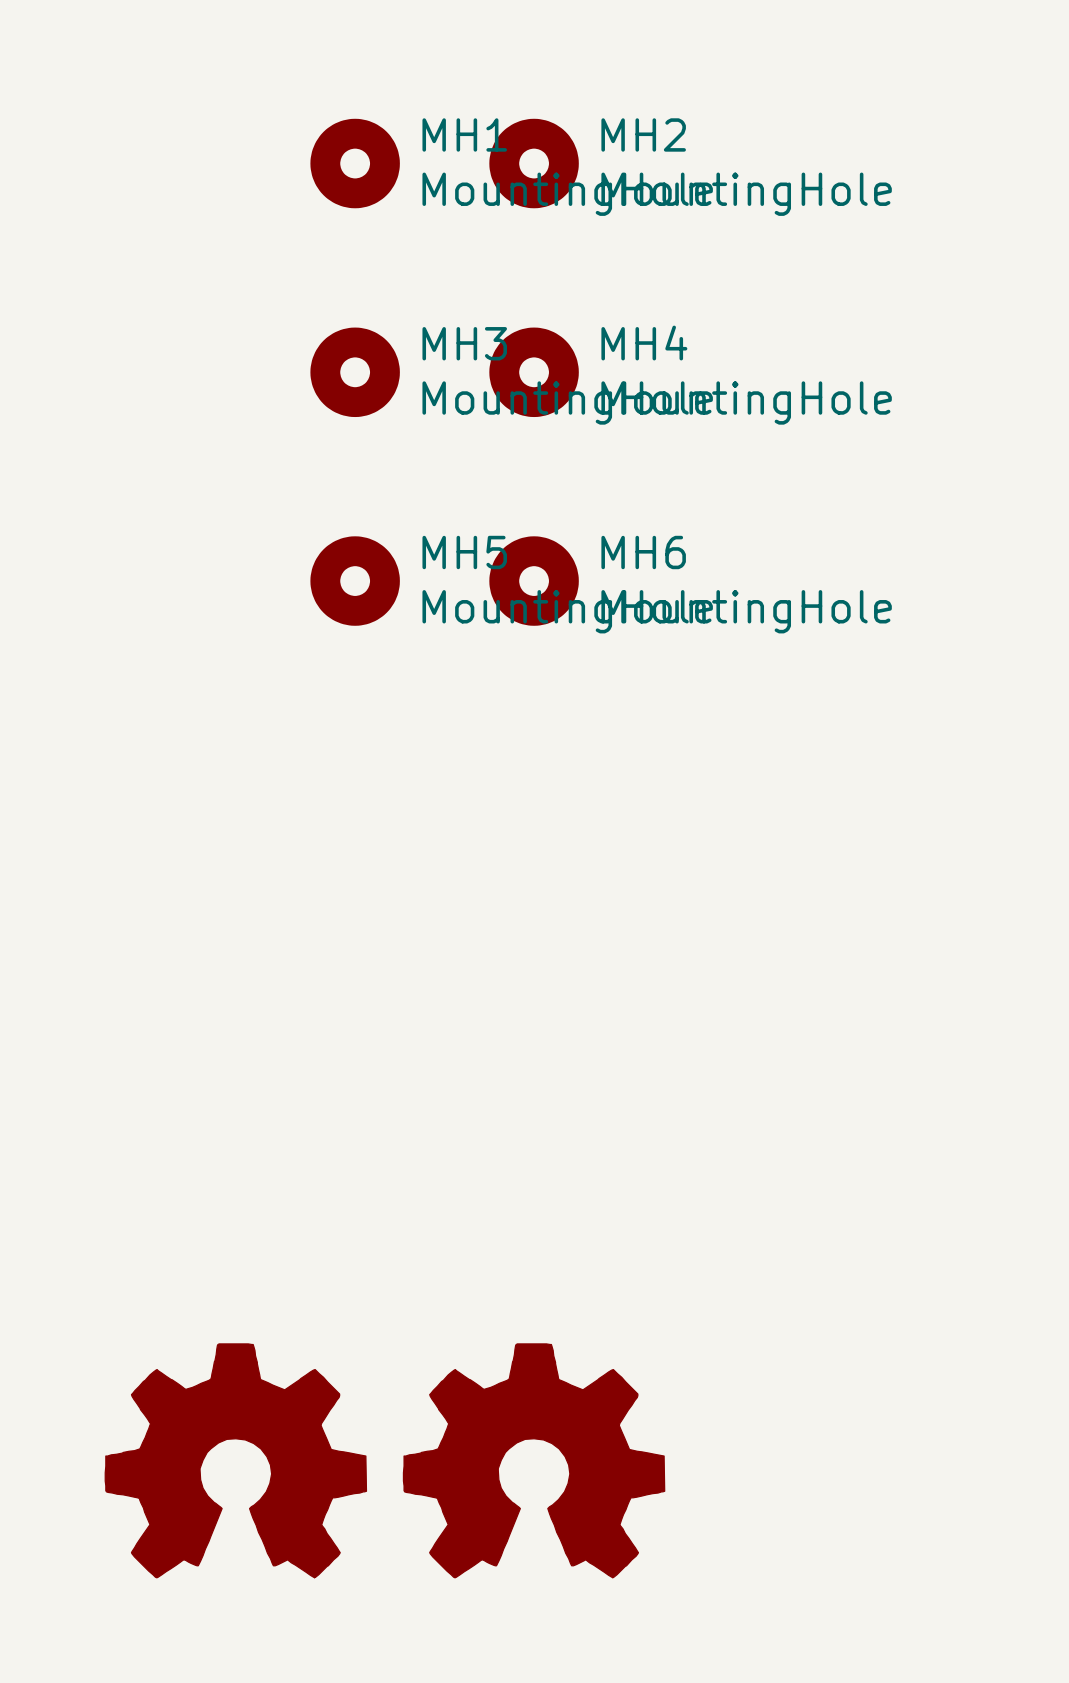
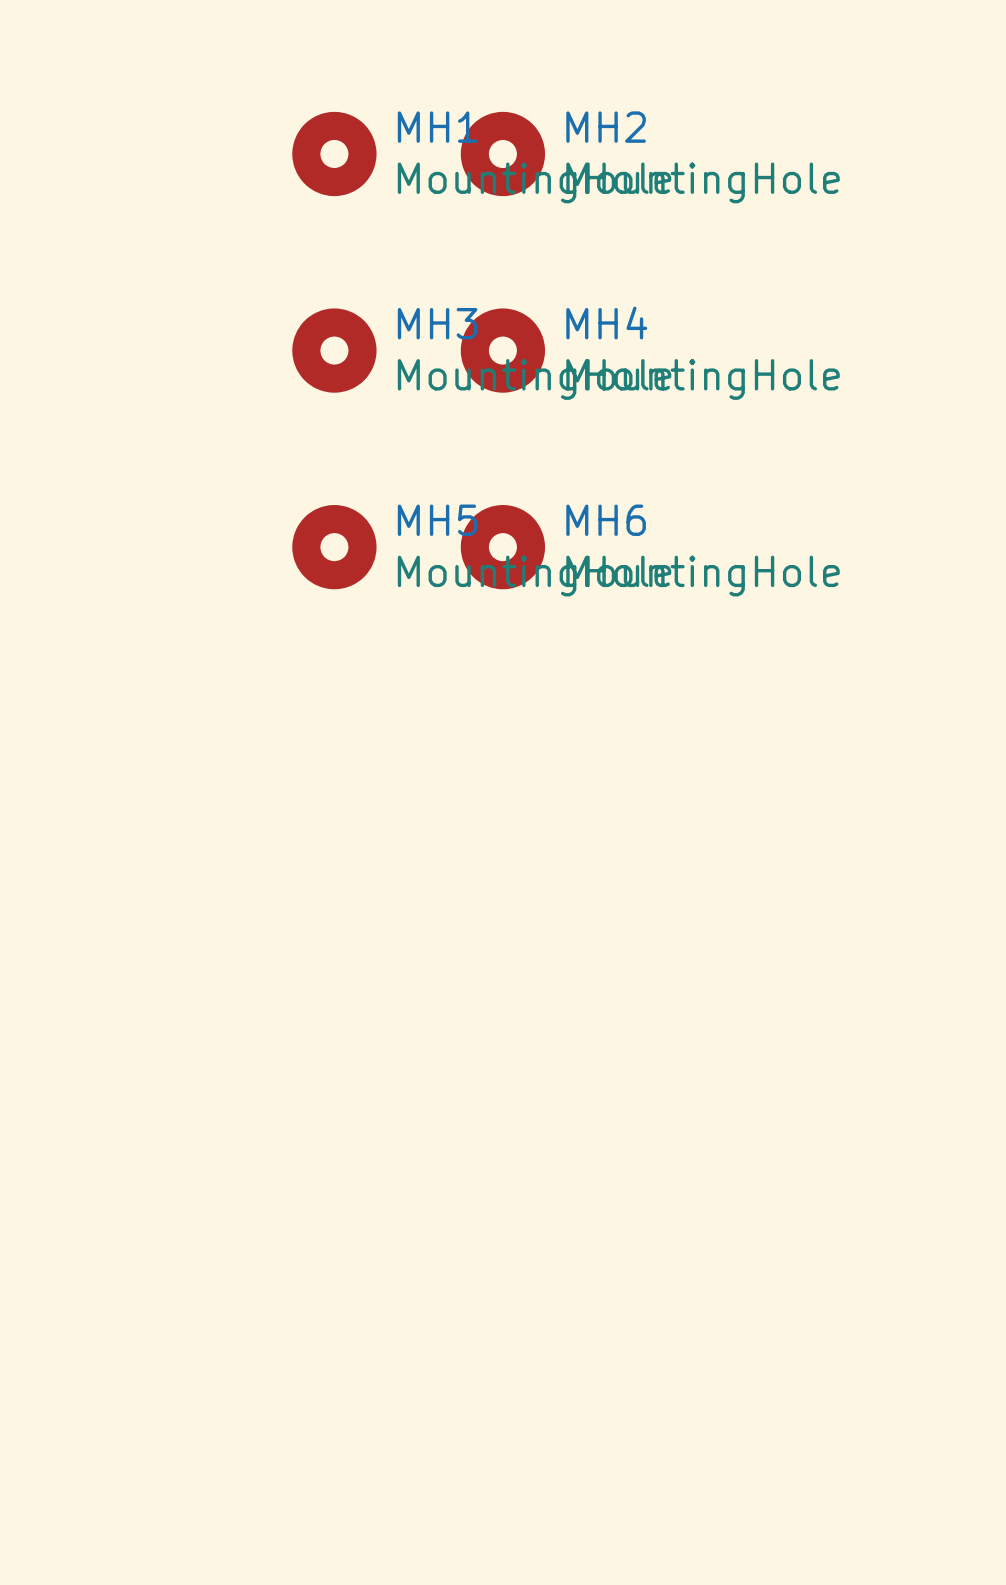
part: (235, 1460) -> none
part: (534, 1460) -> none

